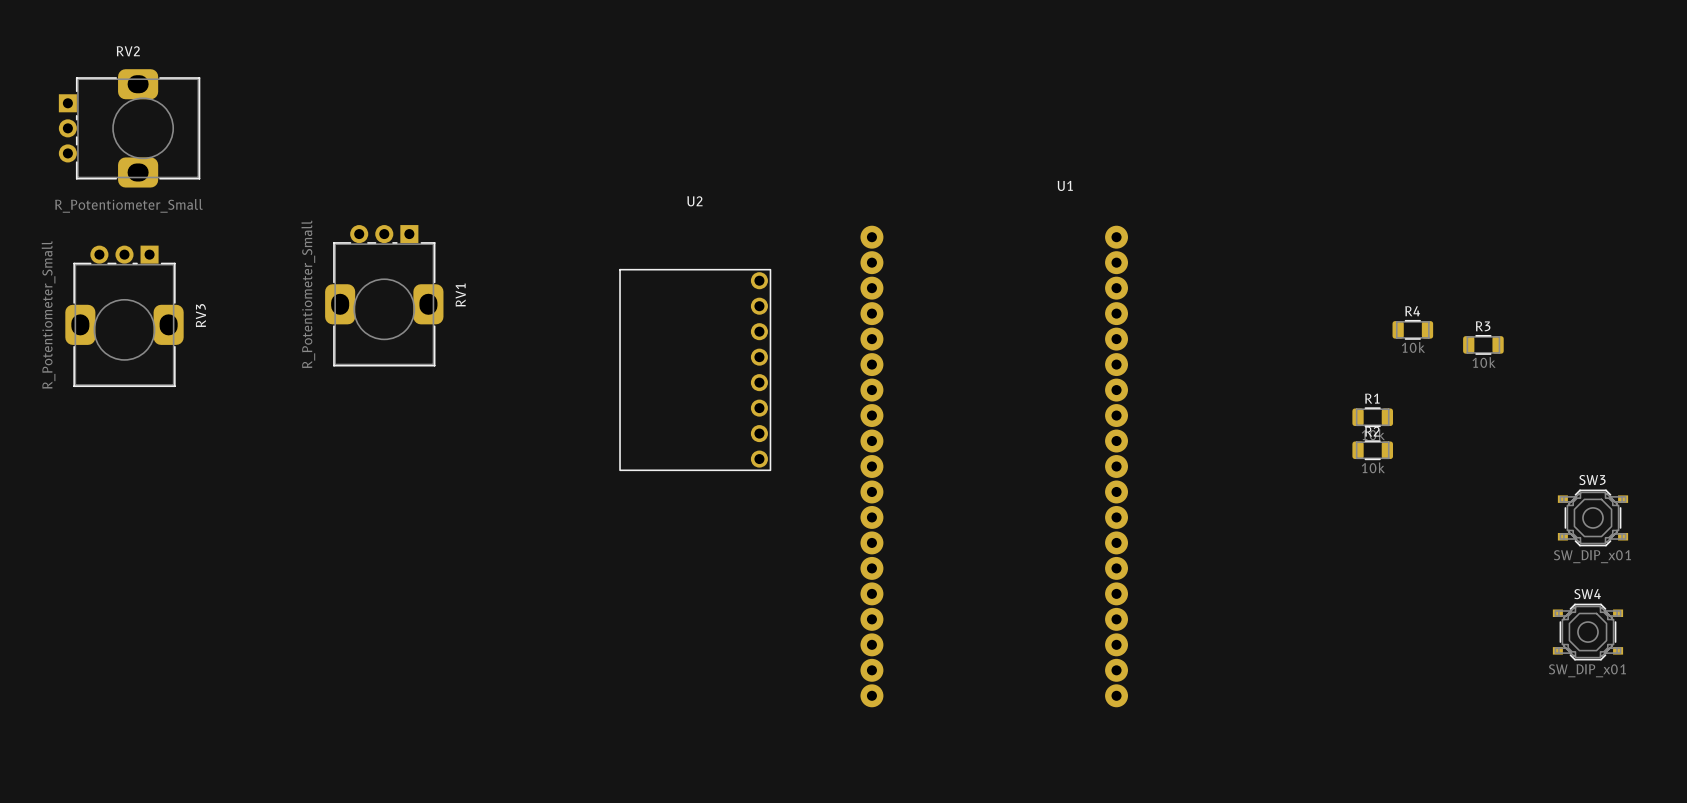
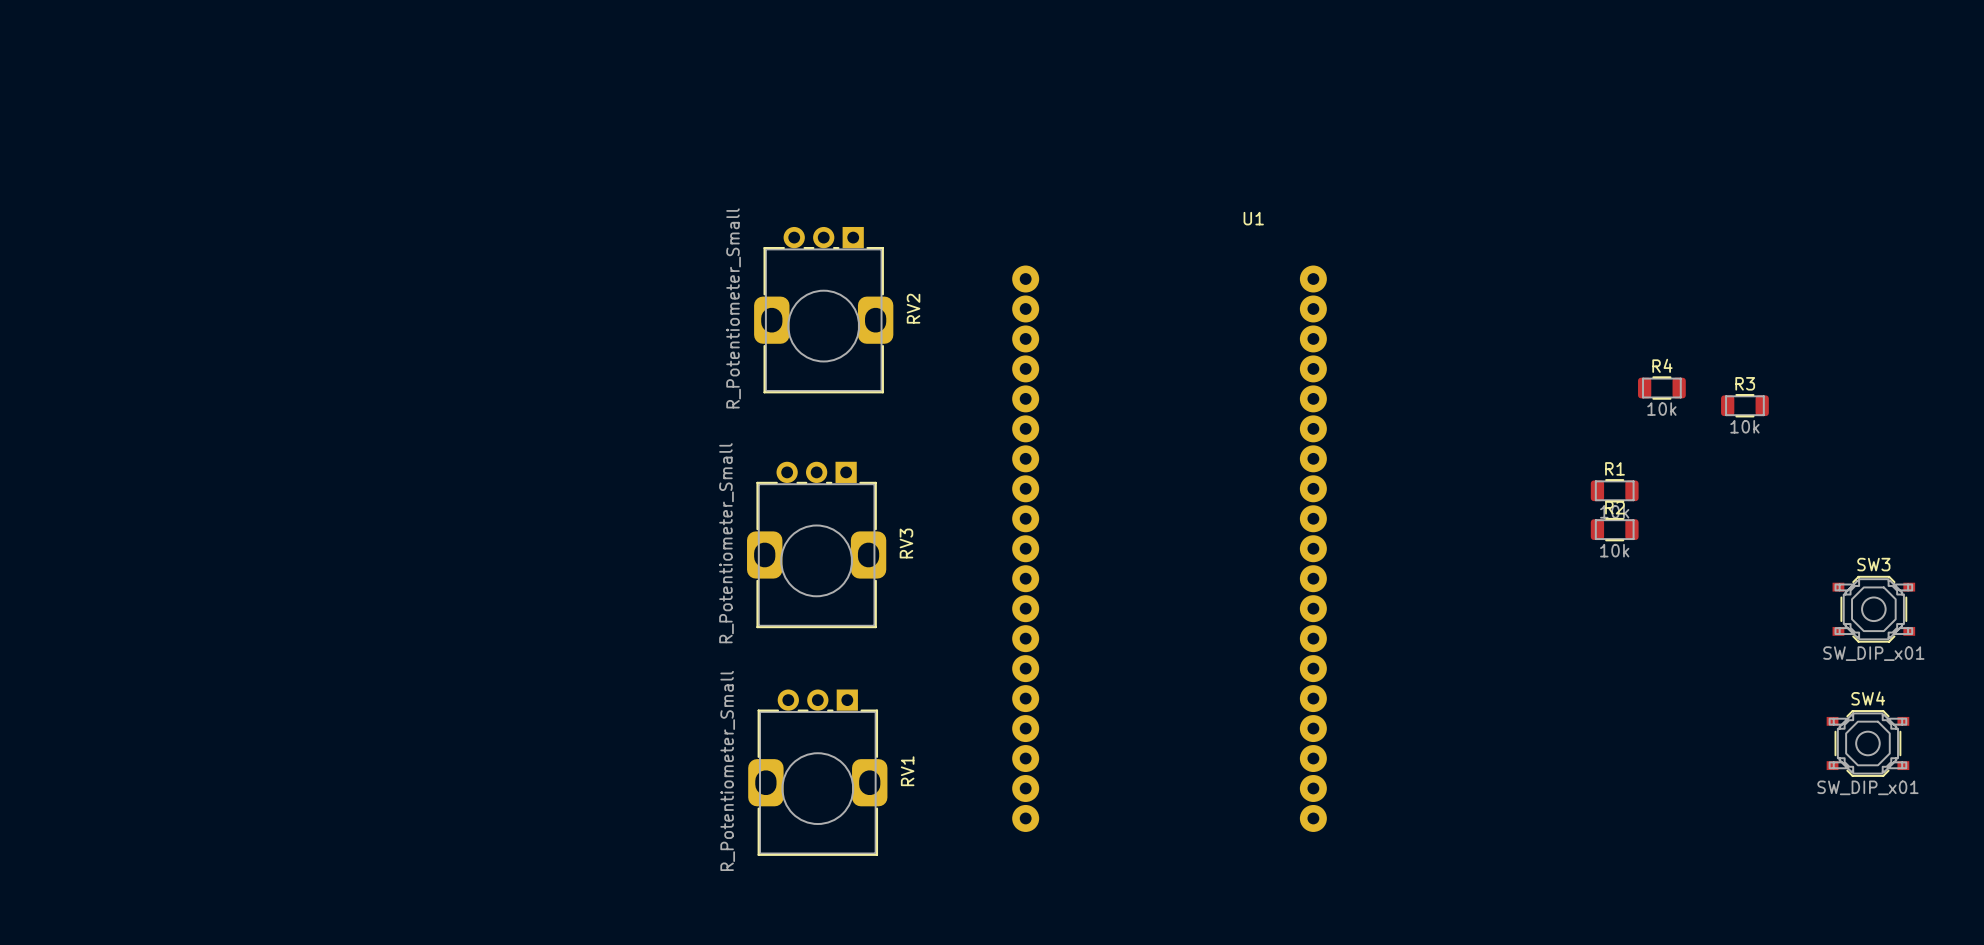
RV2 rotation: 0° (129, 128) -> 90° clockwise (823, 310)
RV2 position: (129, 128) -> (823, 310)
RV1 position: (384, 295) -> (817, 772)
RV3 position: (124, 316) -> (816, 544)
U2: (695, 369) -> none

